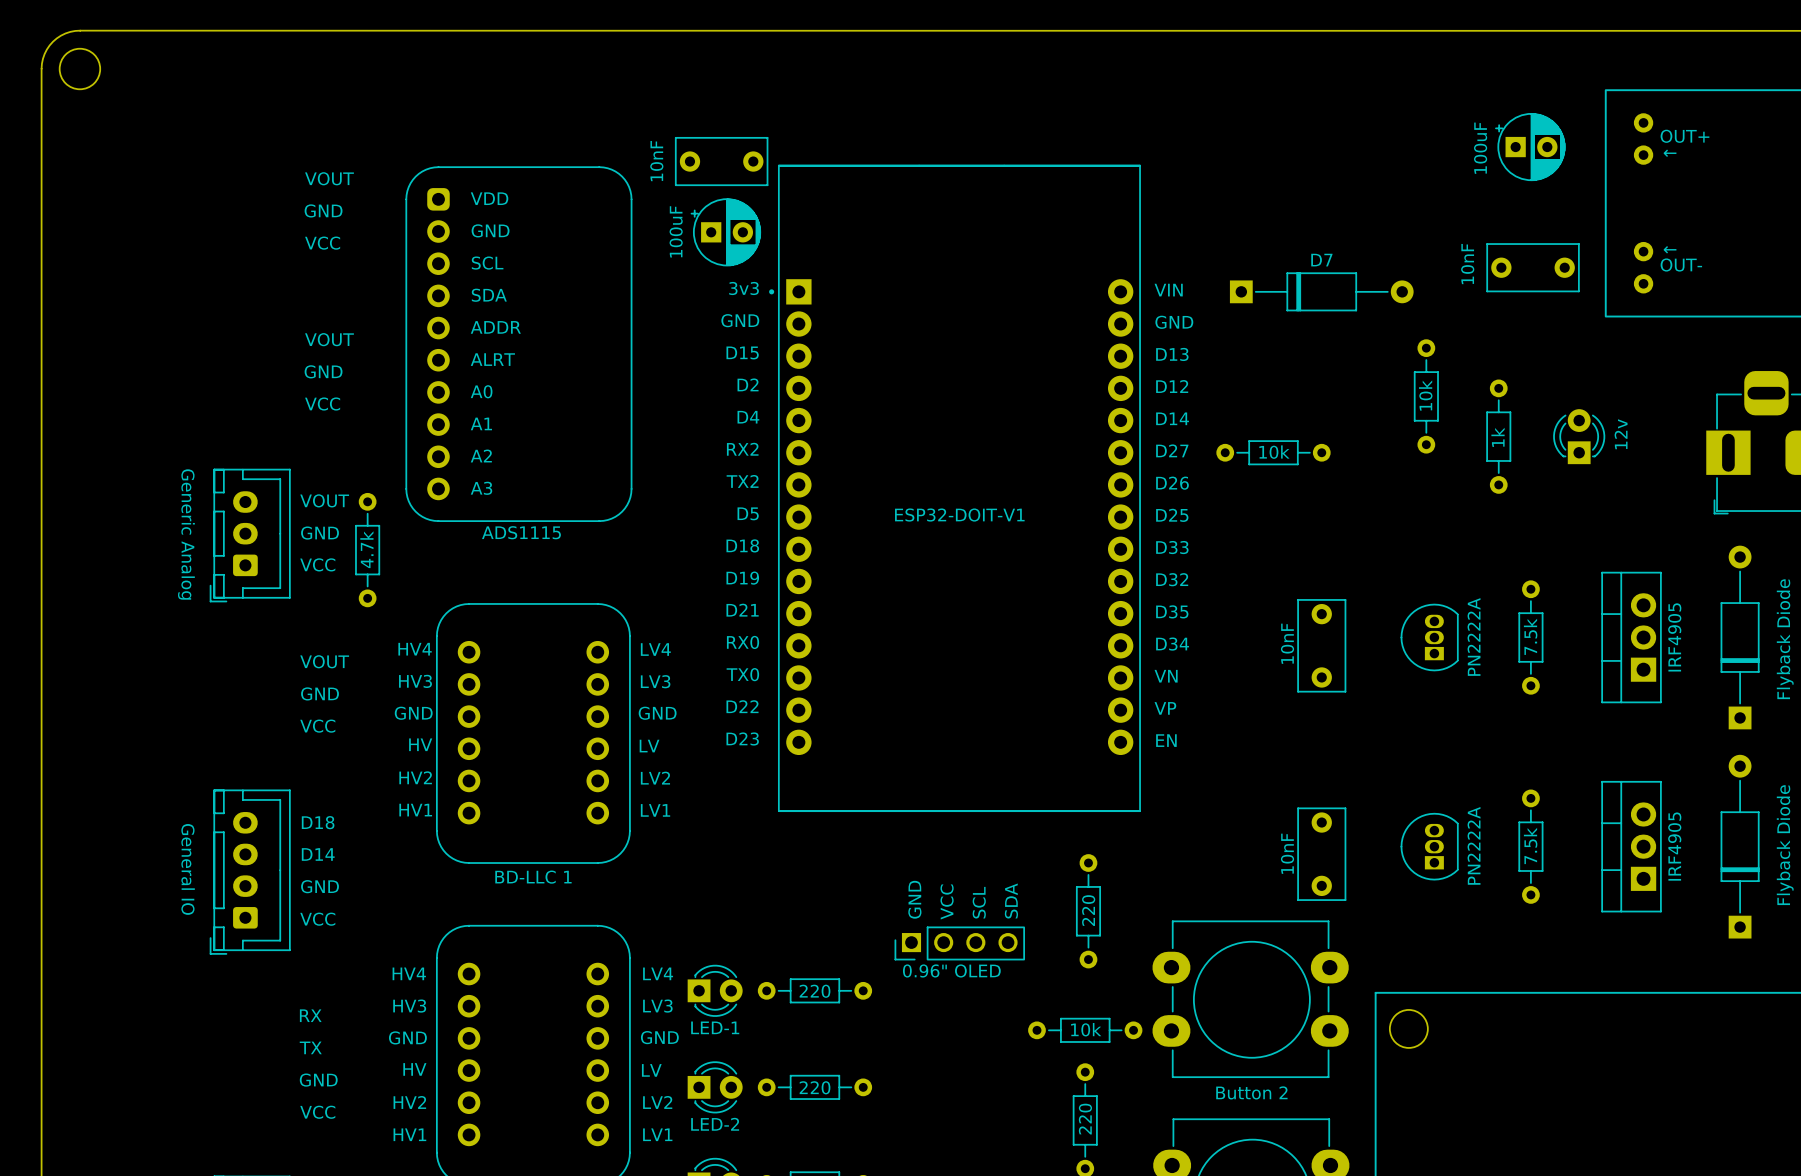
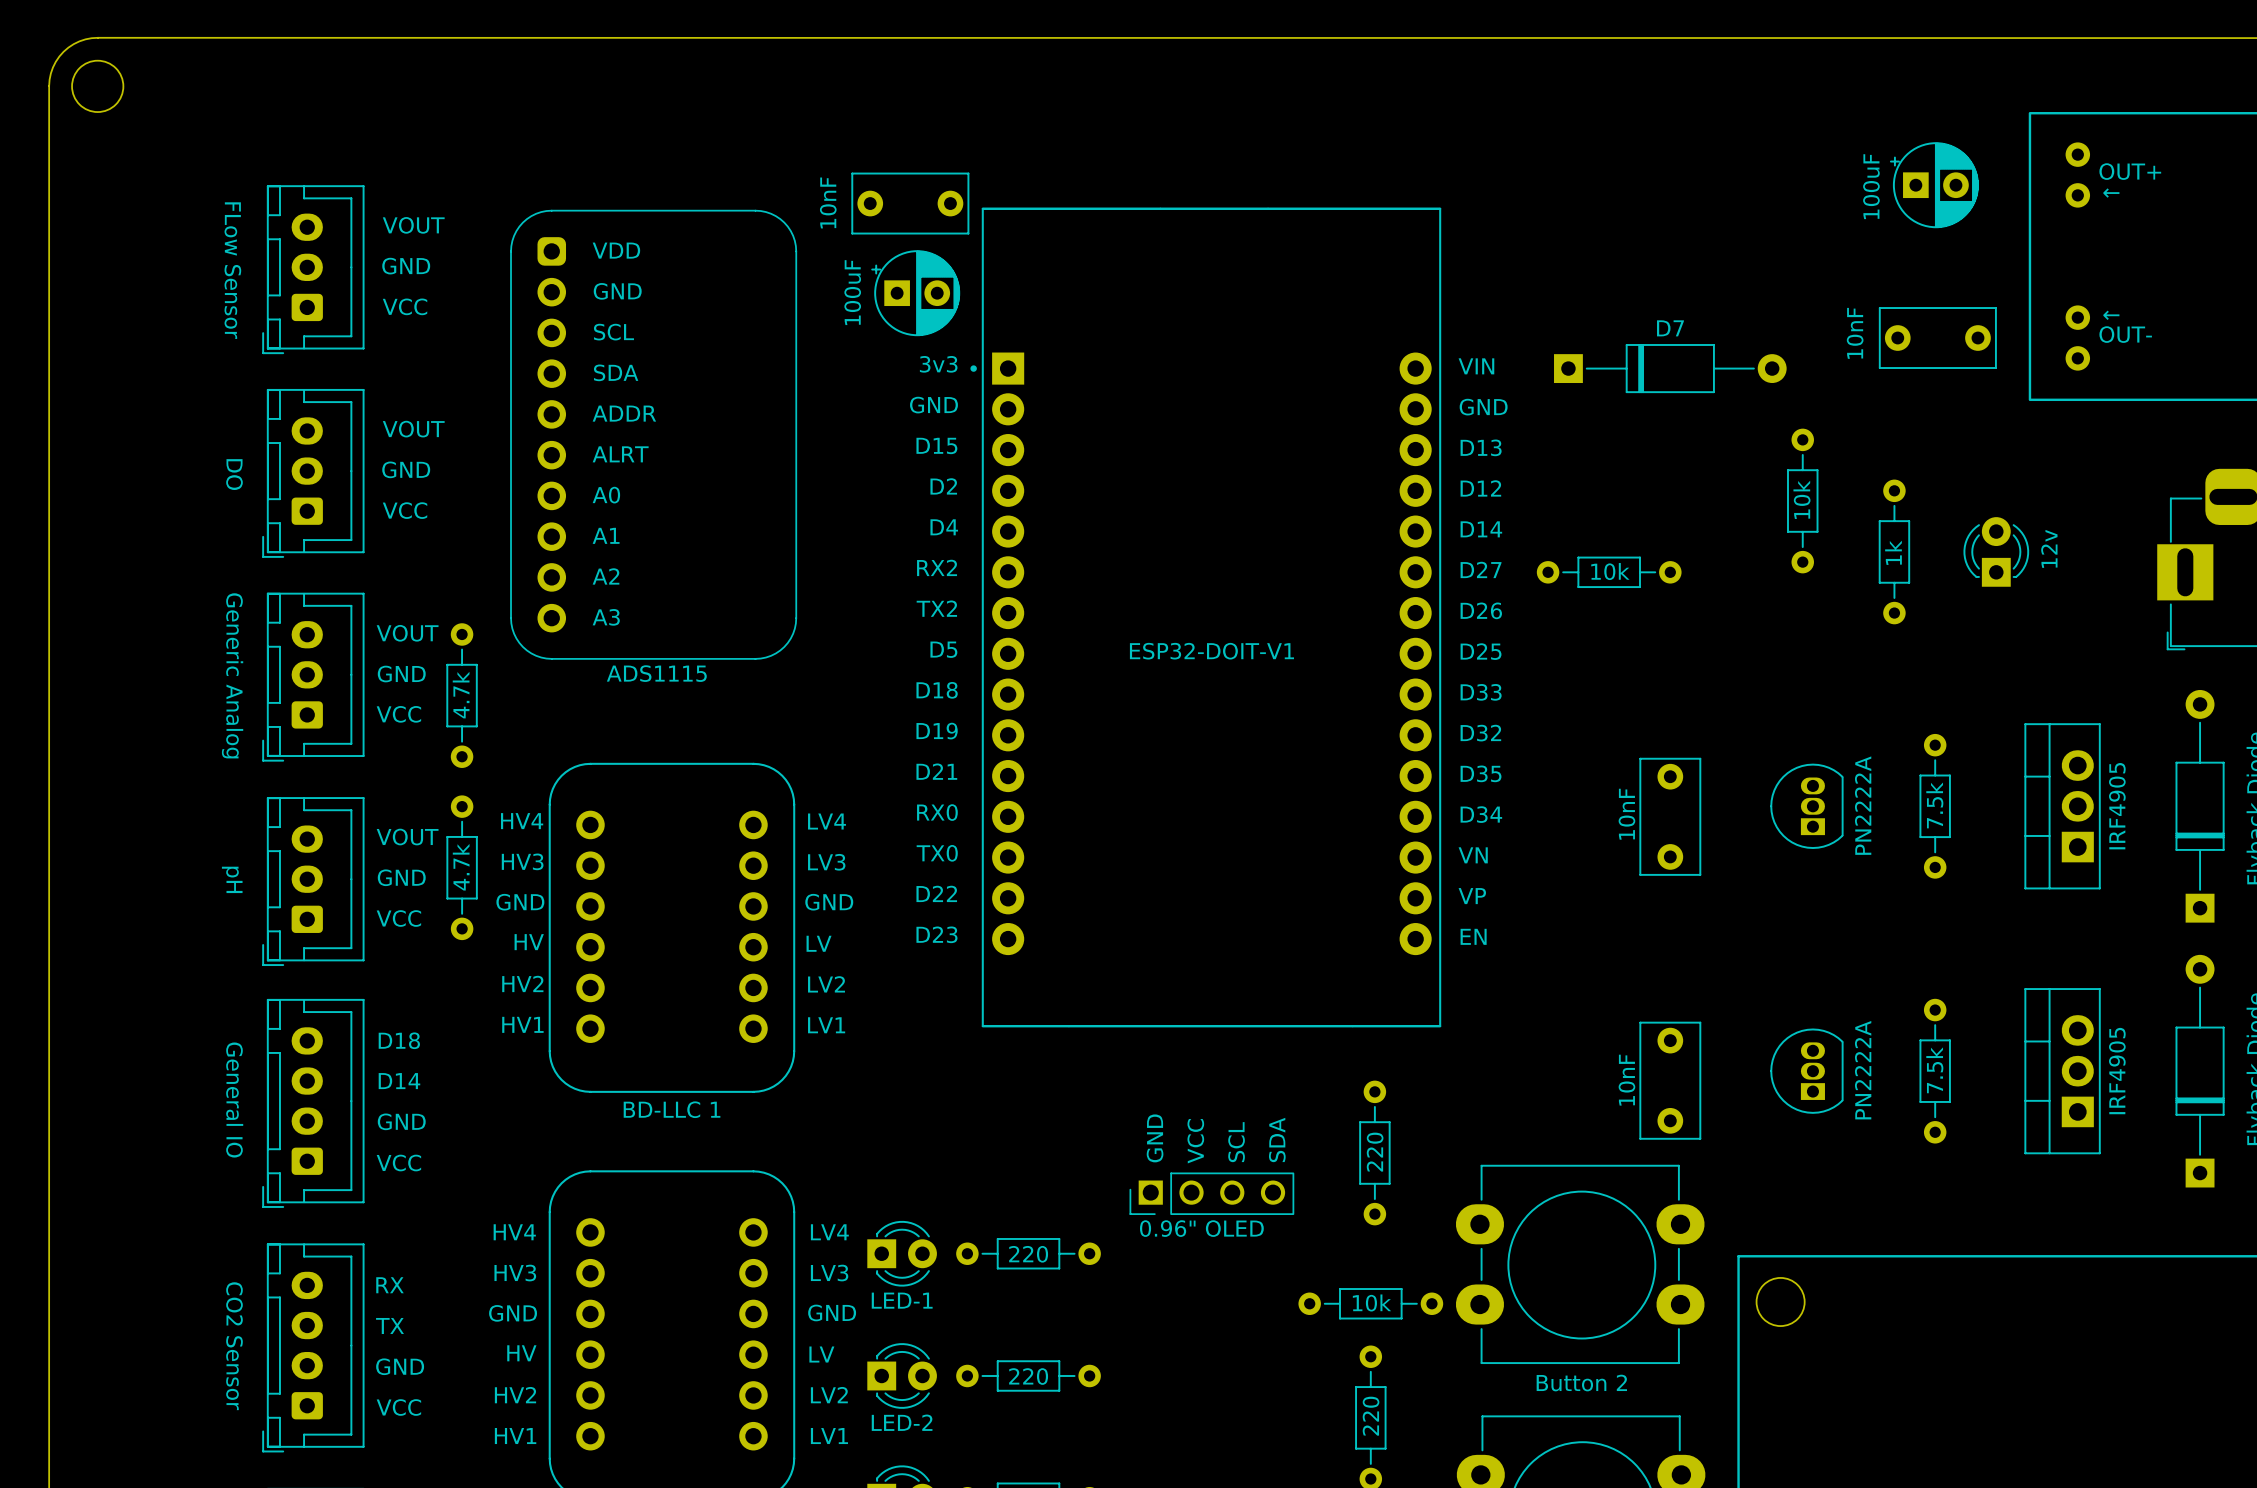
part: none -> FLow Sensor (313, 269)
part: none -> DO (313, 473)
part: none -> 4.7k (462, 867)
part: none -> pH (313, 881)
part: none -> CO2 Sensor (313, 1347)

